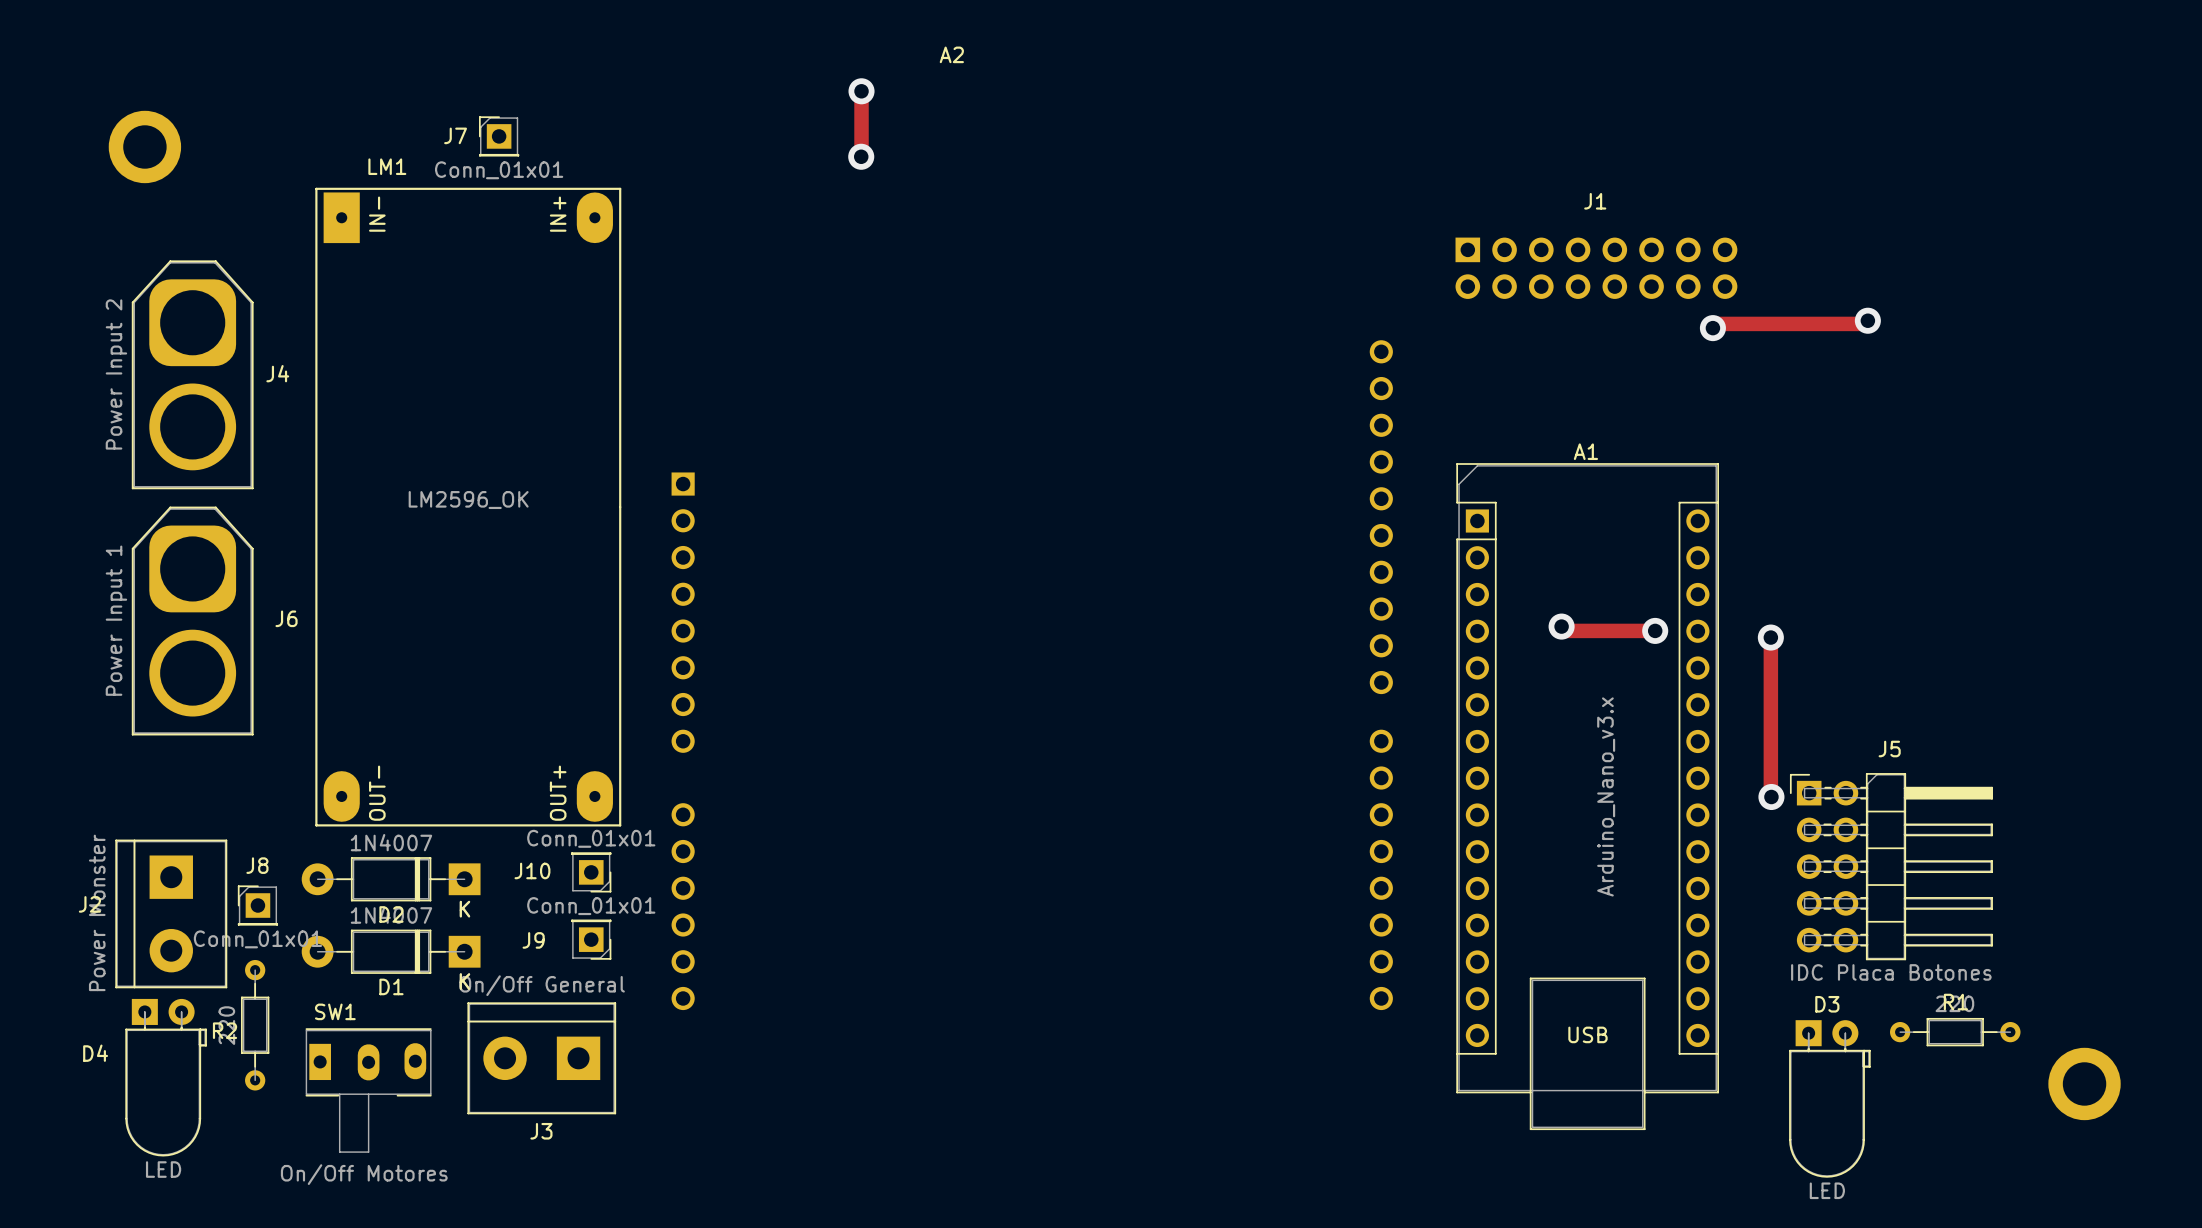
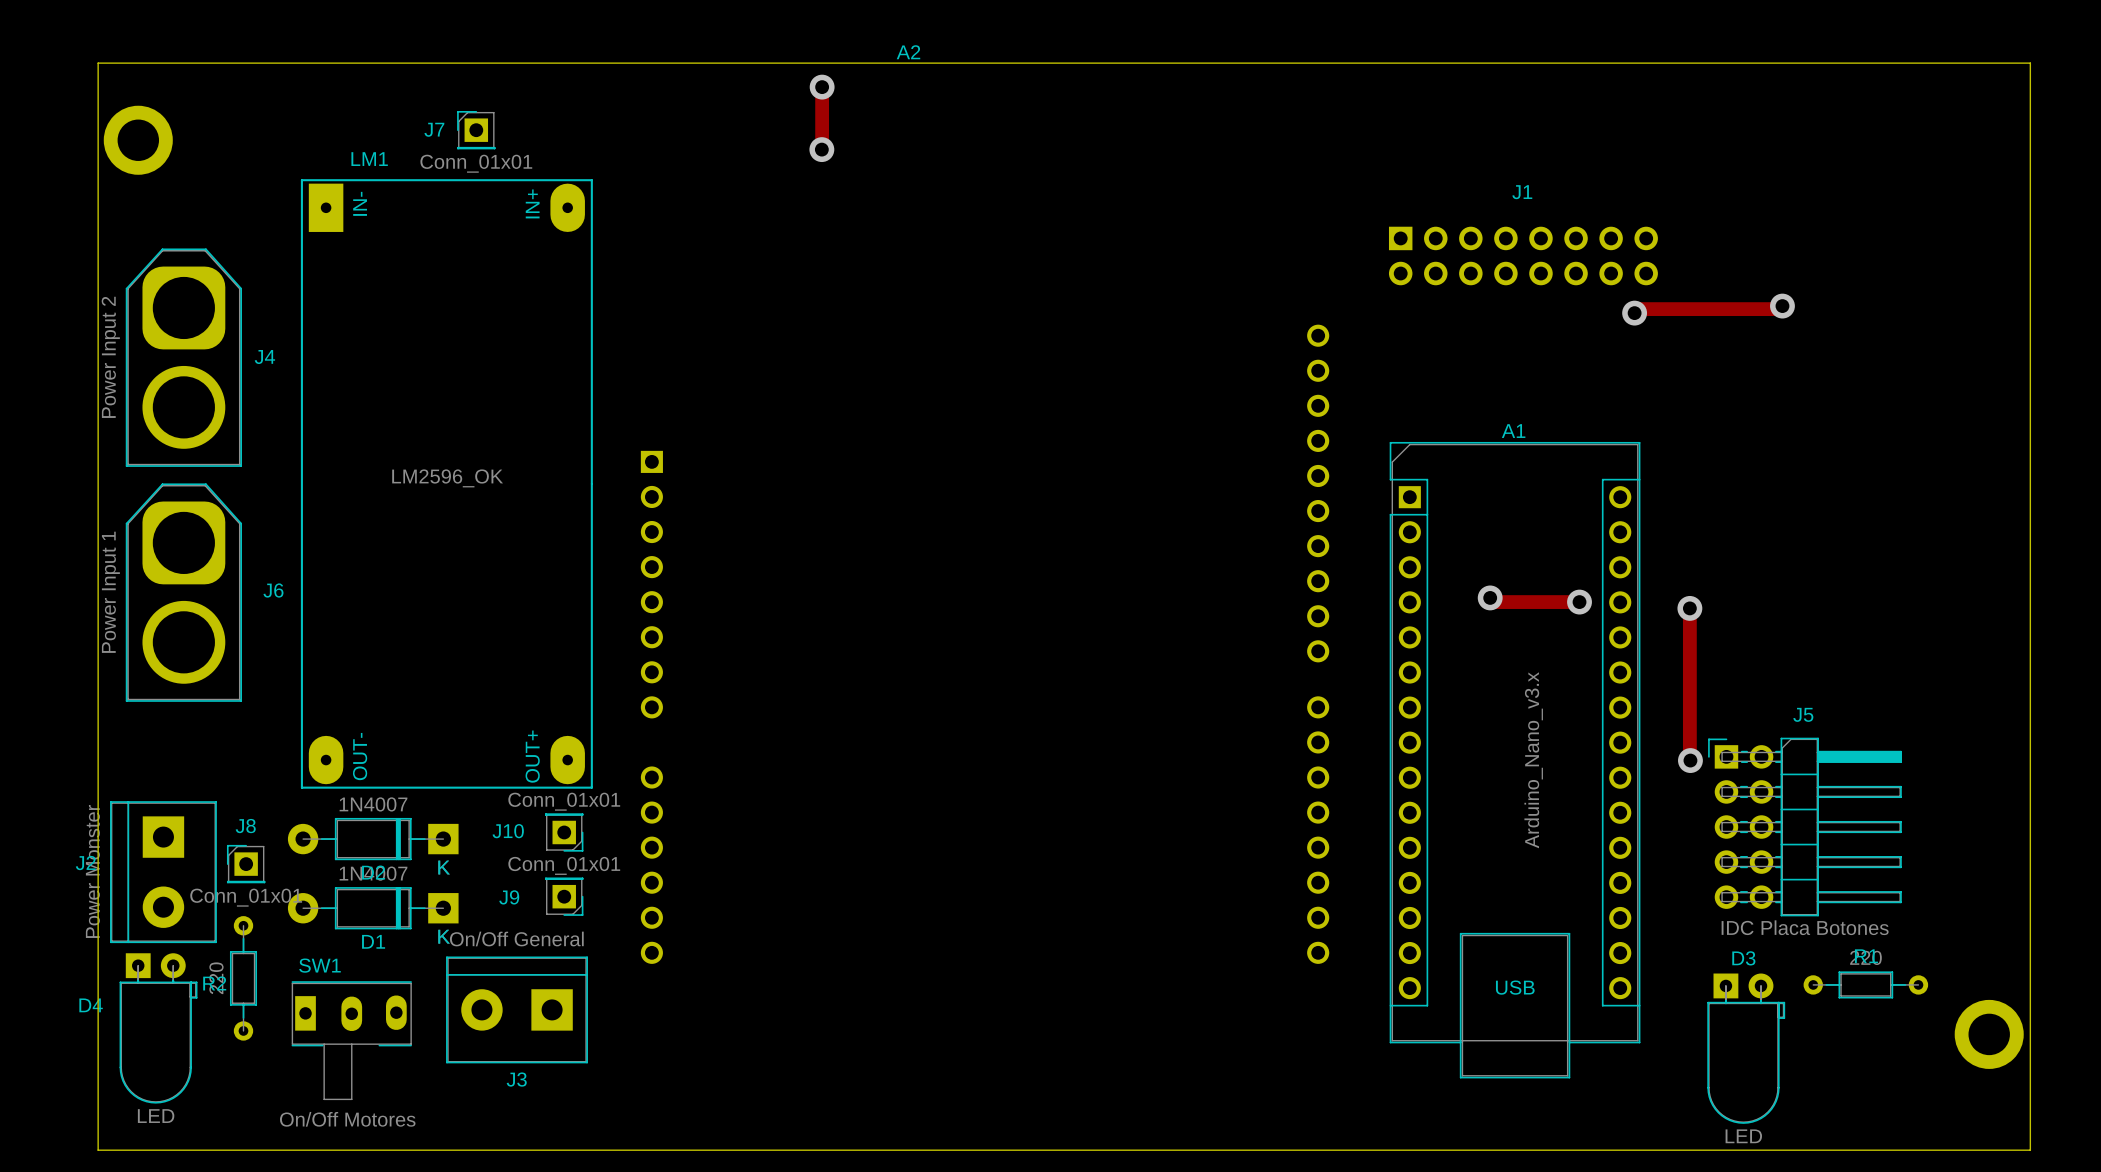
board edge: none -> (98, 63) (2030, 63) (2030, 1150) (98, 1150) (98, 63)

